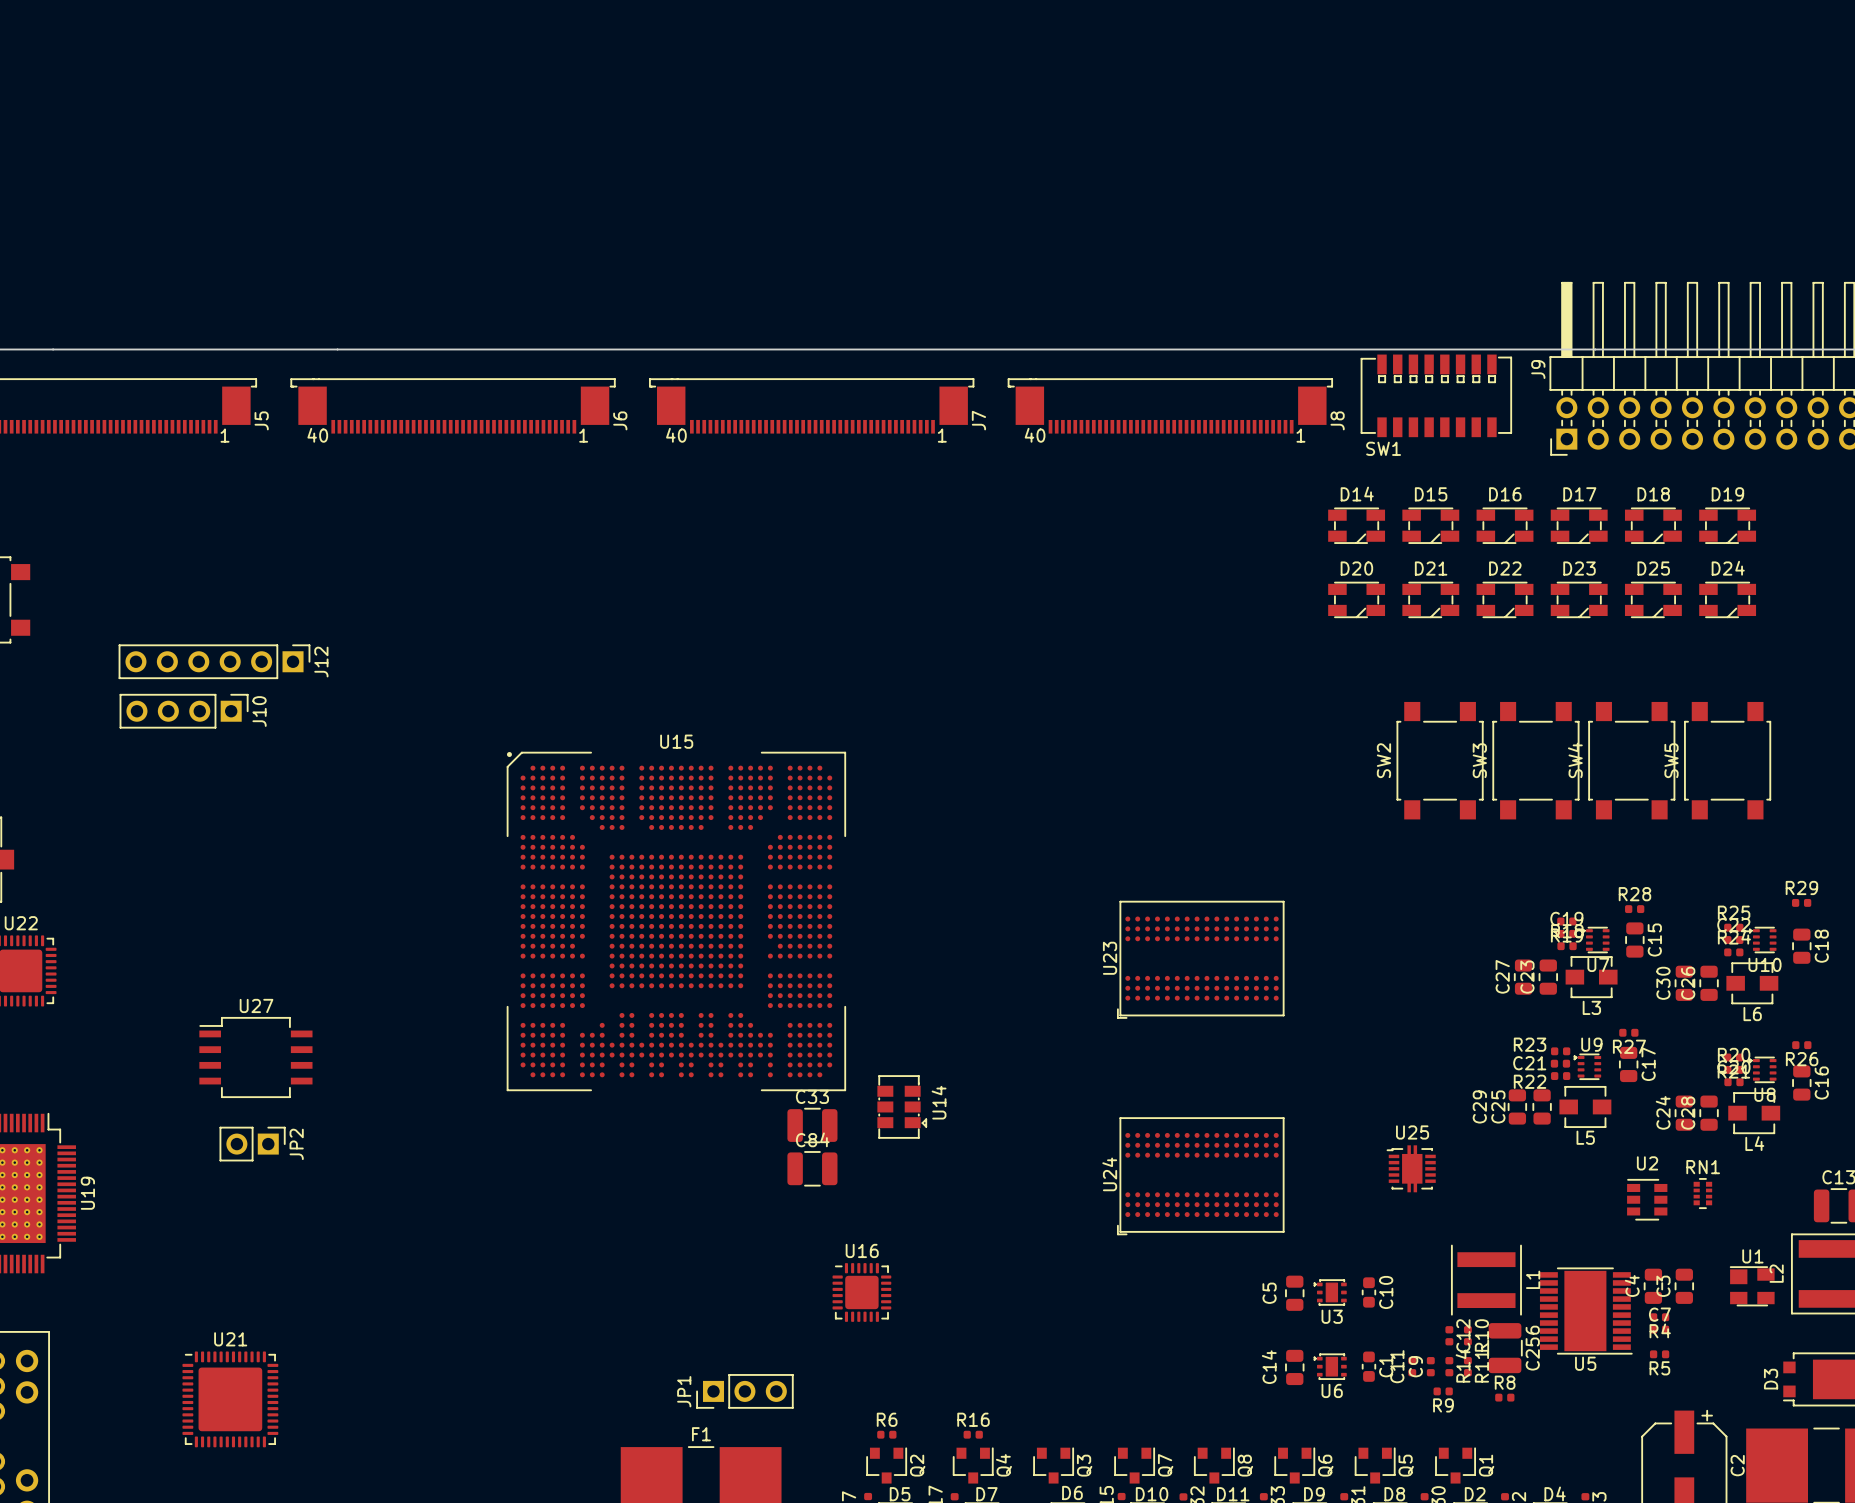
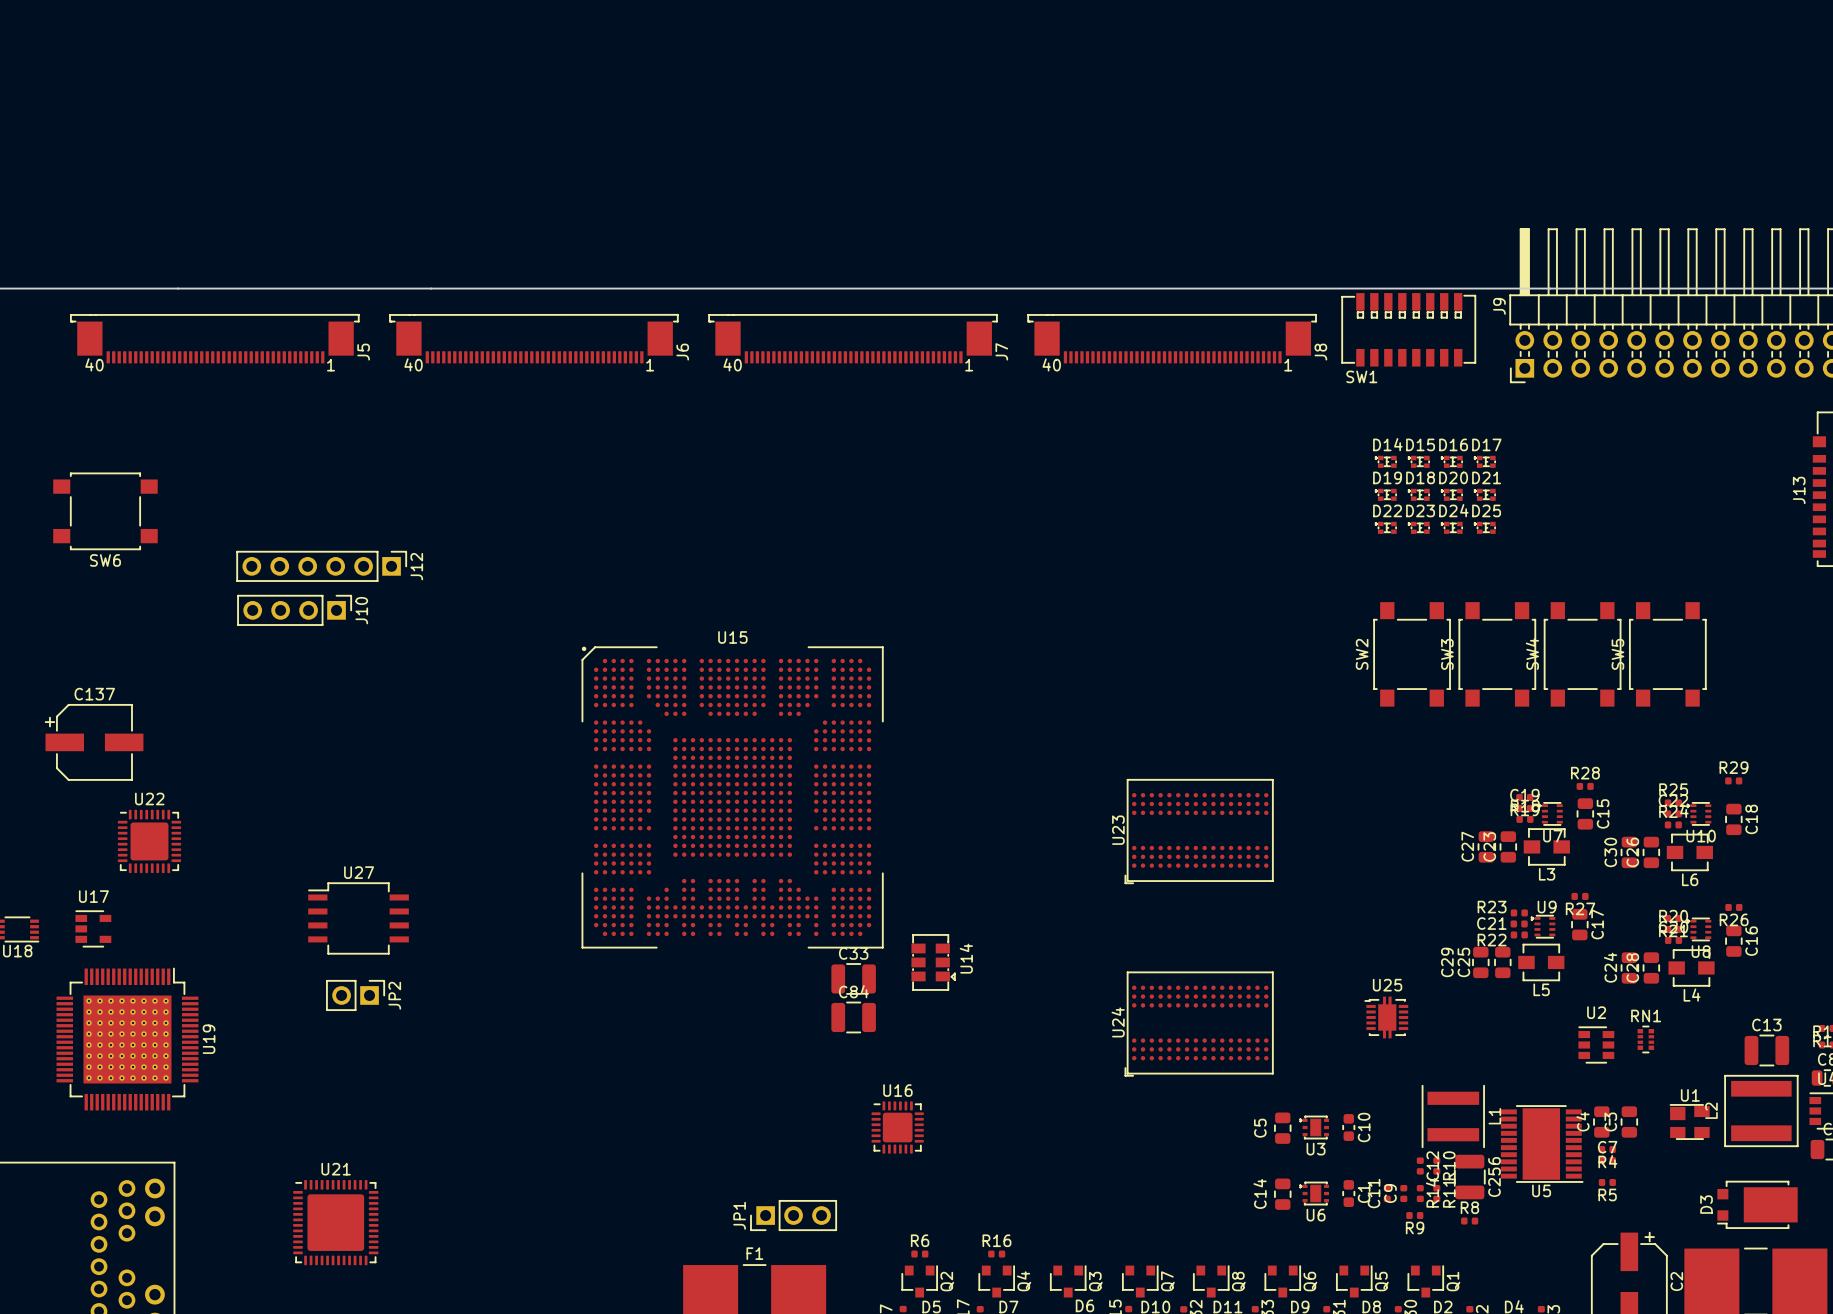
D14 footprint: [1328, 507, 1386, 544] -> [1374, 455, 1397, 468]
D15 footprint: [1402, 507, 1460, 544] -> [1407, 455, 1430, 468]
D16 footprint: [1476, 507, 1534, 544] -> [1440, 455, 1463, 468]
D17 footprint: [1550, 507, 1608, 544] -> [1473, 455, 1496, 468]
D18 footprint: [1624, 507, 1682, 544] -> [1407, 488, 1430, 501]
D19 footprint: [1699, 507, 1757, 544] -> [1374, 488, 1397, 501]
D20 footprint: [1328, 581, 1386, 619] -> [1440, 488, 1463, 501]
D21 footprint: [1402, 581, 1460, 619] -> [1473, 488, 1496, 501]
D22 footprint: [1476, 581, 1534, 619] -> [1374, 521, 1397, 534]
D23 footprint: [1550, 581, 1608, 619] -> [1407, 521, 1430, 534]
D25 footprint: [1624, 581, 1682, 619] -> [1473, 521, 1496, 534]
D24 footprint: [1699, 581, 1757, 619] -> [1440, 521, 1463, 534]

